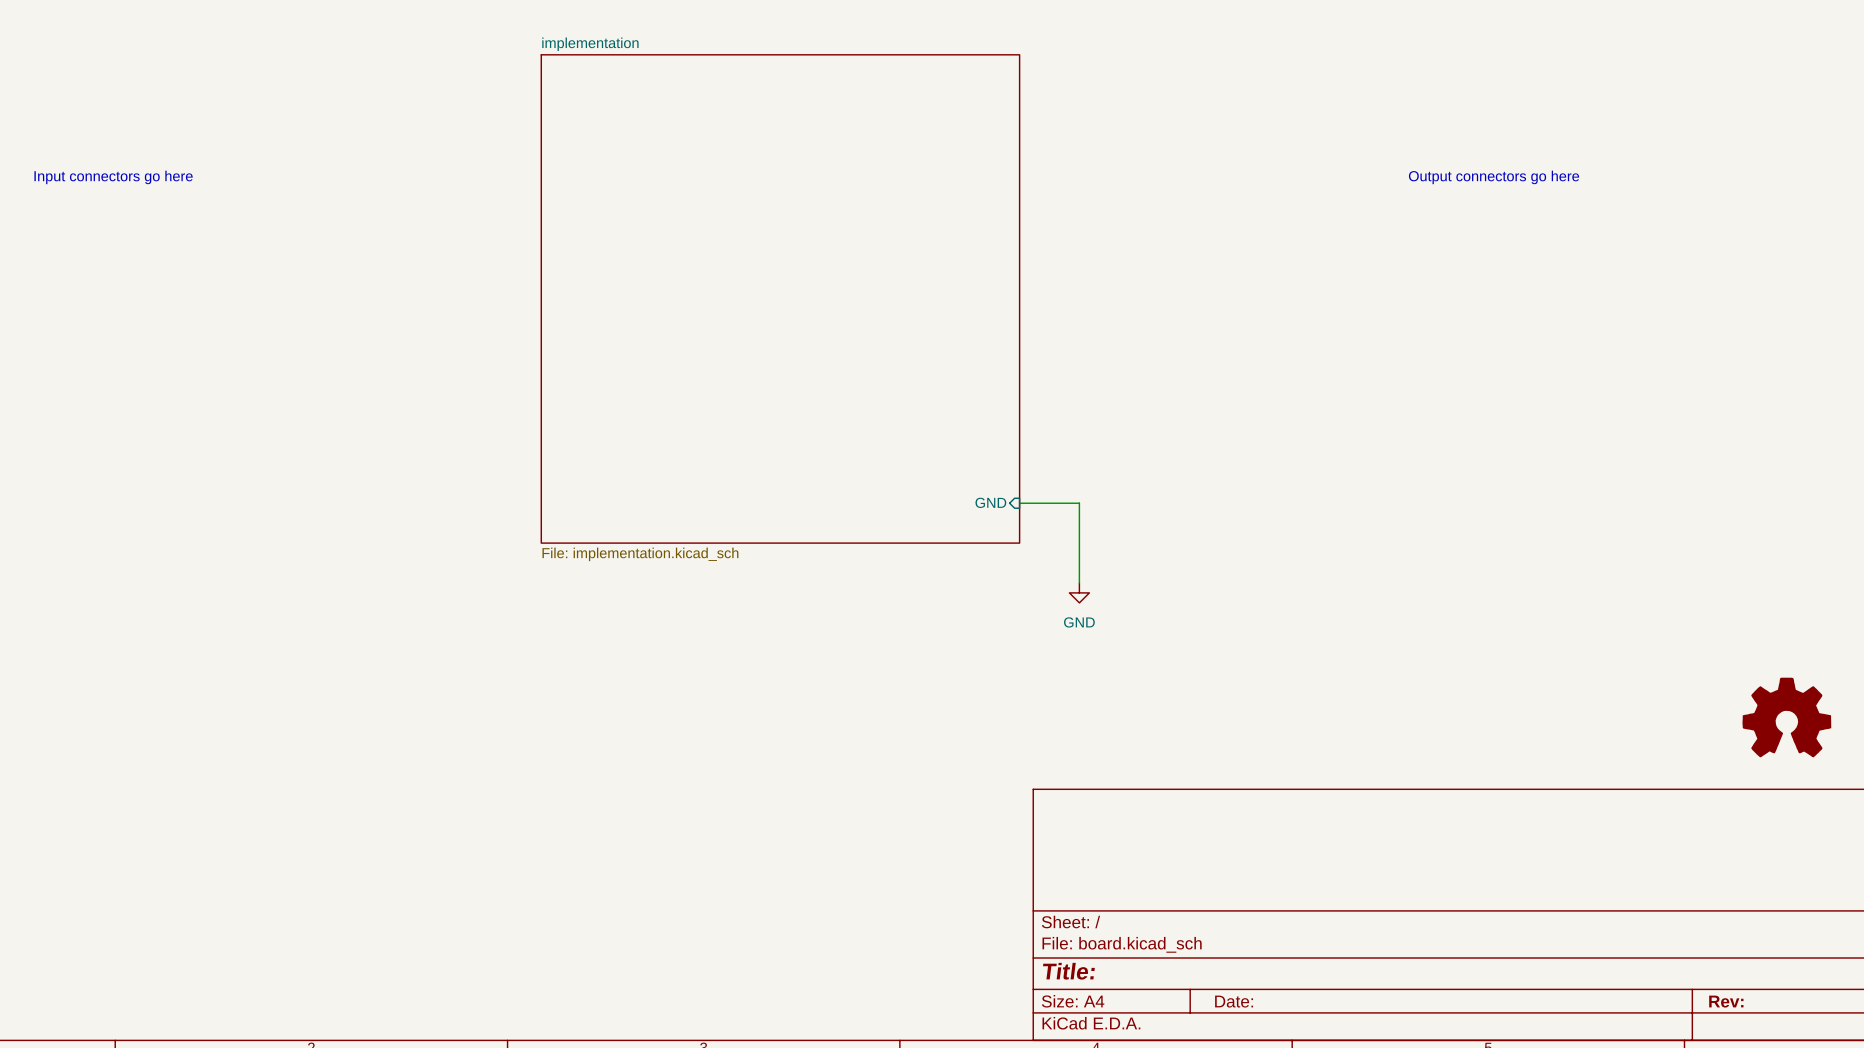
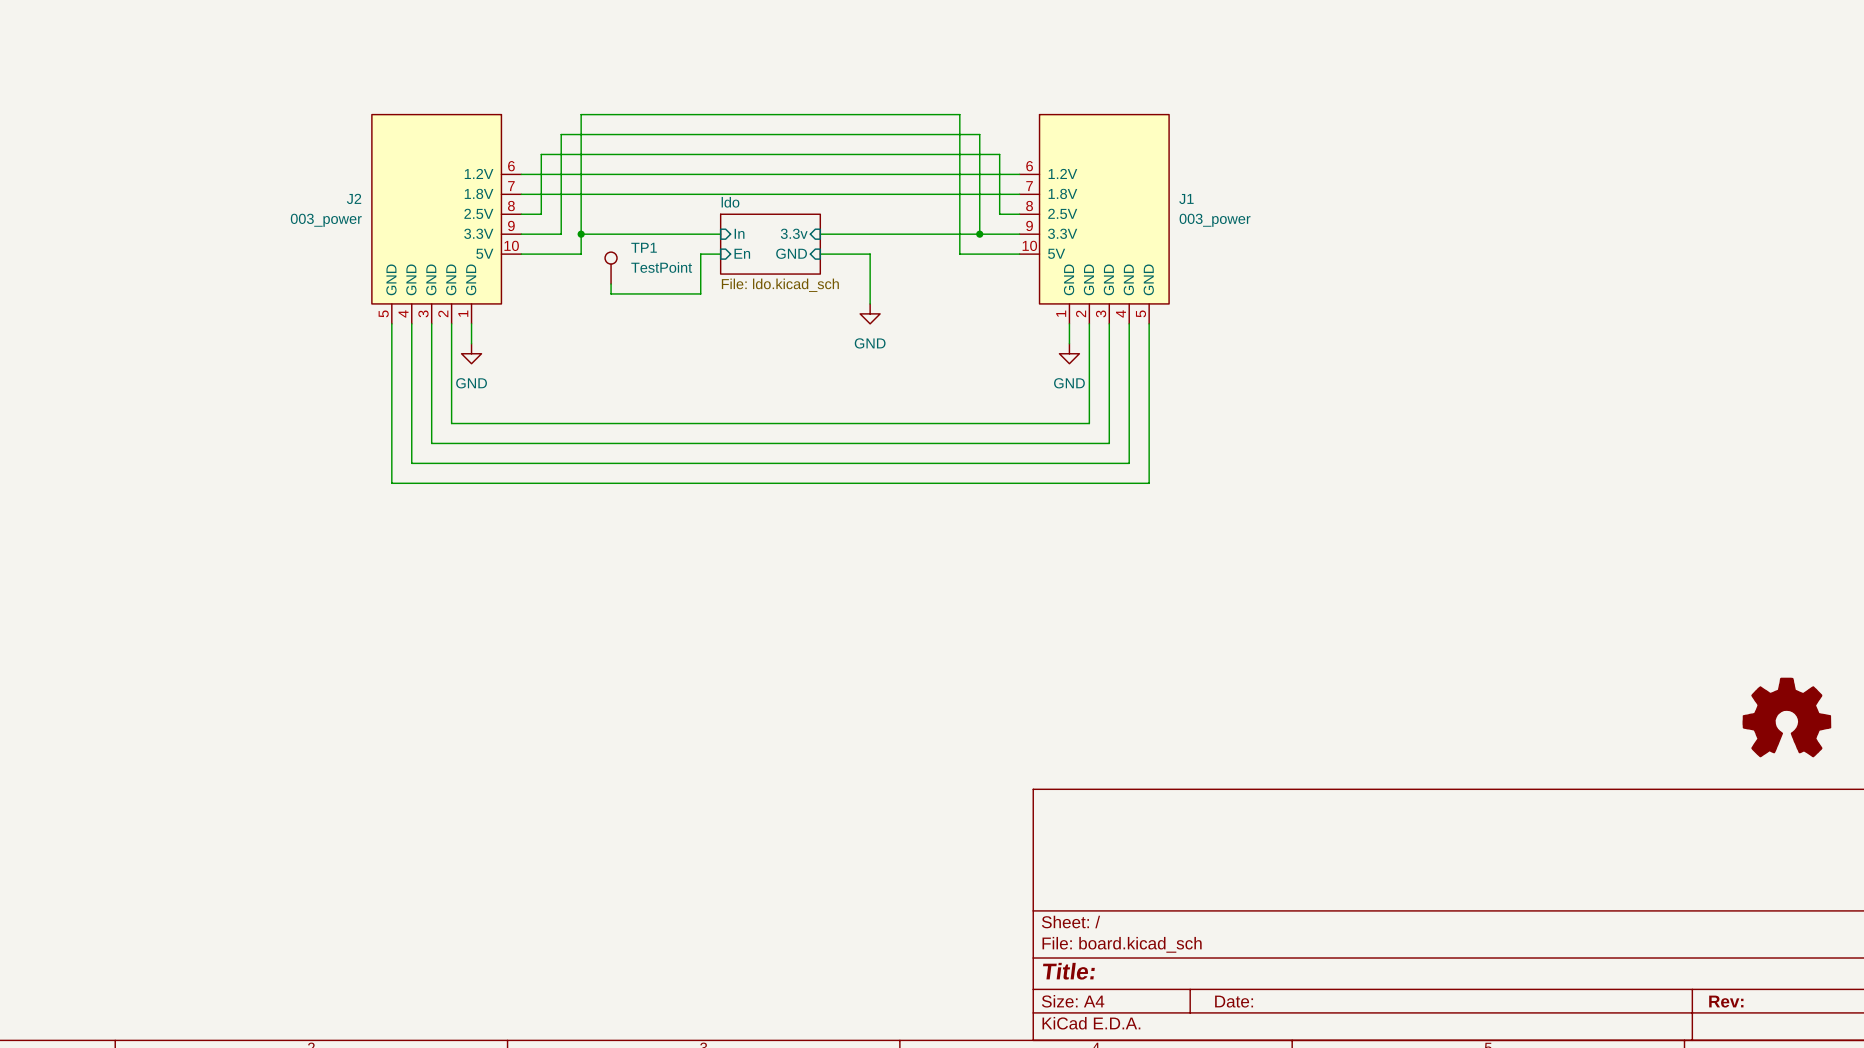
wire: none -> (521, 174) (1019, 174)
text: Input connectors go here (113, 177) -> none
text: Output connectors go here (1494, 177) -> none
wire: none -> (521, 194) (1019, 194)
wire: none -> (521, 214) (541, 214) (541, 154) (999, 154) (999, 214) (1019, 214)
J2: none -> 003_power (446, 219)
J1: none -> 003_power (1094, 219)
sheet pin: none -> In (739, 233)
sheet pin: none -> 3.3v (794, 233)
wire: none -> (521, 234) (561, 234) (561, 134) (979, 134) (979, 234)
wire: none -> (581, 234) (720, 234)
junction: none -> (581, 234)
wire: none -> (820, 234) (1019, 234)
junction: none -> (979, 234)
sheet ldo: none -> File: ldo.kicad_sch (770, 244)
sheet pin: none -> En (742, 253)
sheet pin: none -> GND (791, 253)
wire: none -> (521, 254) (581, 254) (581, 114) (959, 114) (959, 254) (1019, 254)
wire: none -> (720, 254) (700, 254) (700, 293) (611, 293) (611, 284)
wire: none -> (820, 254) (870, 254) (870, 303)
TP1: none -> TestPoint (611, 268)
sheet implementation: File: implementation.kicad_sch (780, 298) -> none
power symbol: none -> GND (870, 313)
wire: none -> (391, 323) (391, 483) (1149, 483) (1149, 323)
wire: none -> (411, 323) (411, 463) (1129, 463) (1129, 323)
wire: none -> (431, 323) (431, 443) (1109, 443) (1109, 323)
wire: none -> (451, 323) (451, 423) (1089, 423) (1089, 323)
wire: none -> (471, 323) (471, 343)
wire: none -> (1069, 323) (1069, 343)
power symbol: none -> GND (471, 353)
power symbol: none -> GND (1069, 353)
sheet pin: GND (990, 502) -> none
wire: (1019, 503) (1079, 503) (1079, 582) -> none
power symbol: GND (1079, 592) -> none

